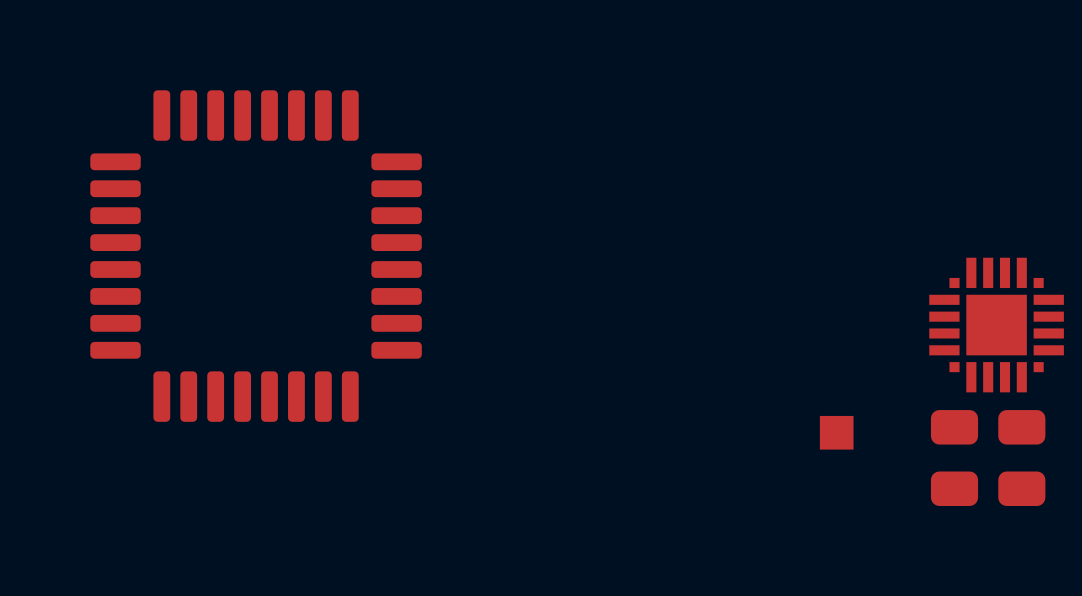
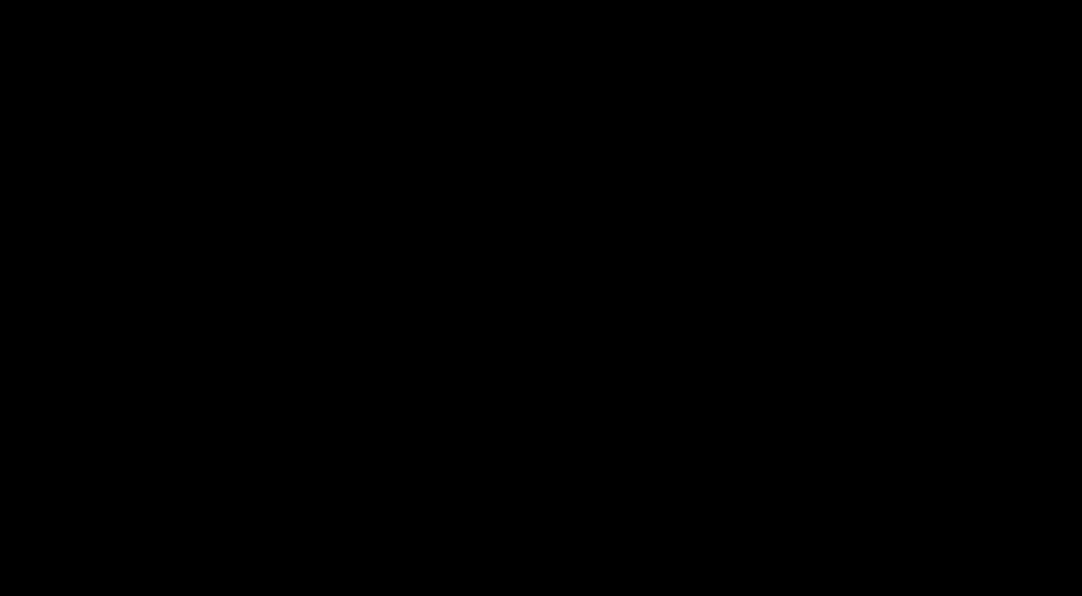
part: (256, 256) -> none
part: (996, 325) -> none
part: (836, 432) -> none
part: (954, 458) -> none
part: (1021, 458) -> none

